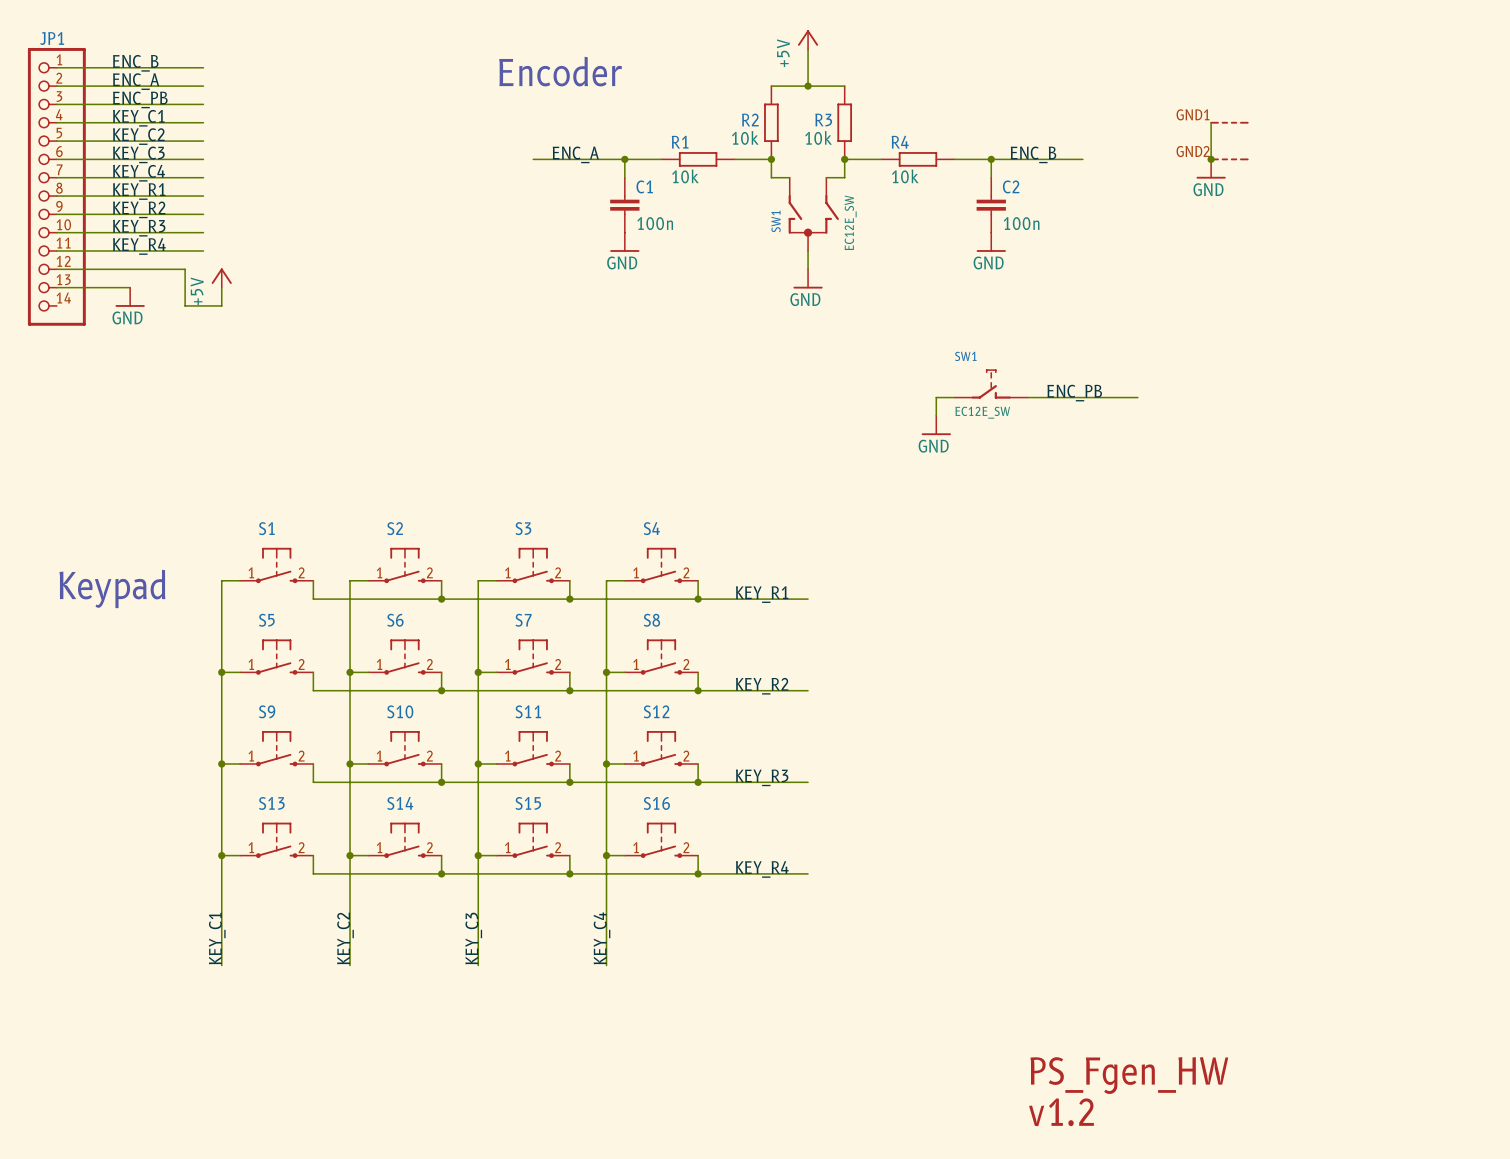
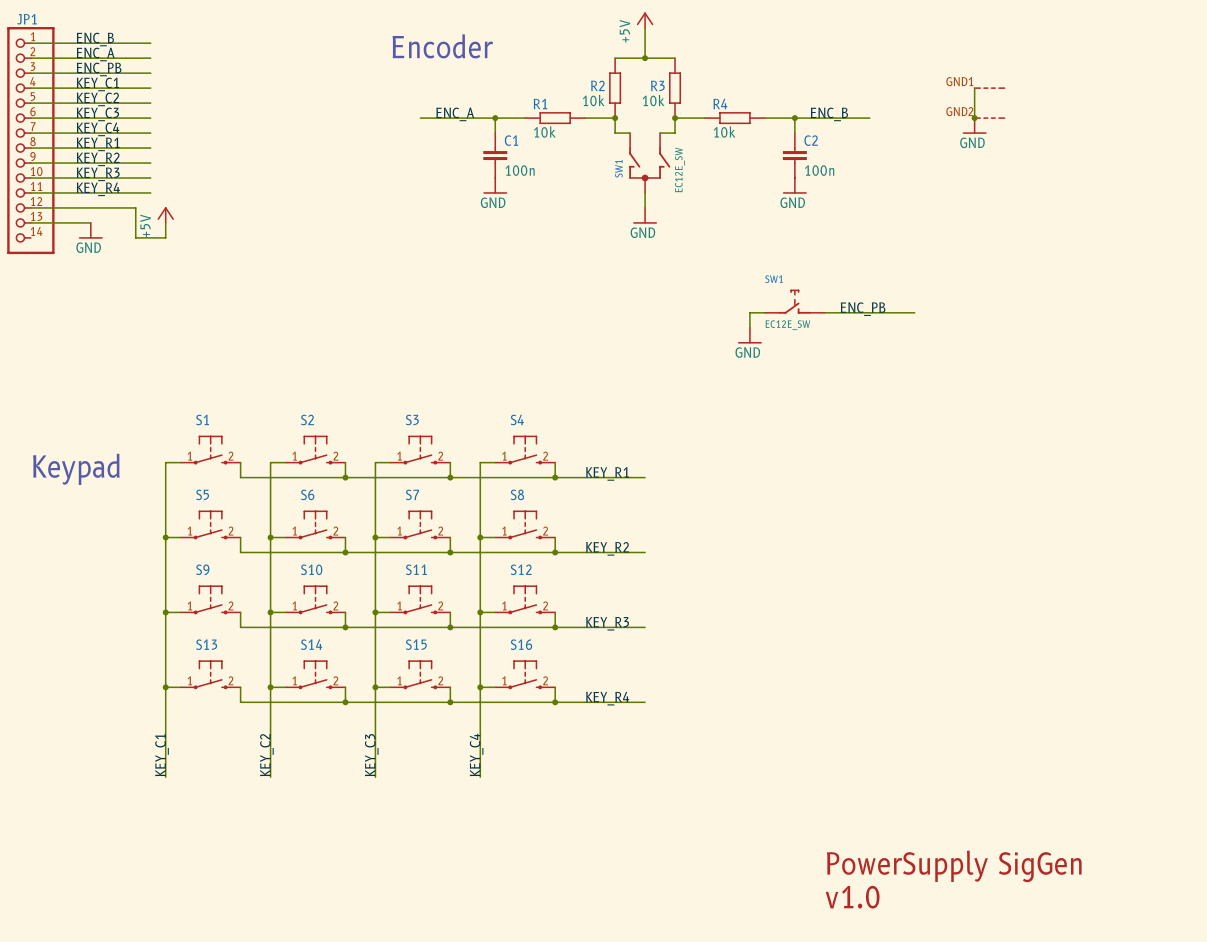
text: PS_Fgen_HW (1129, 1075) -> PowerSupply SigGen (954, 866)
text: v1.2 (1061, 1112) -> v1.0 (852, 897)

